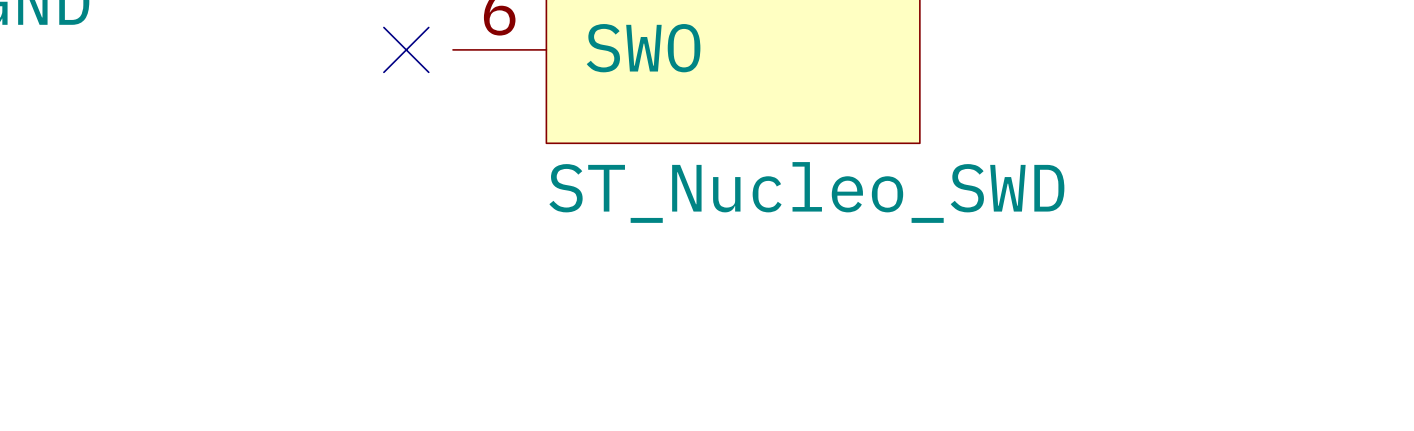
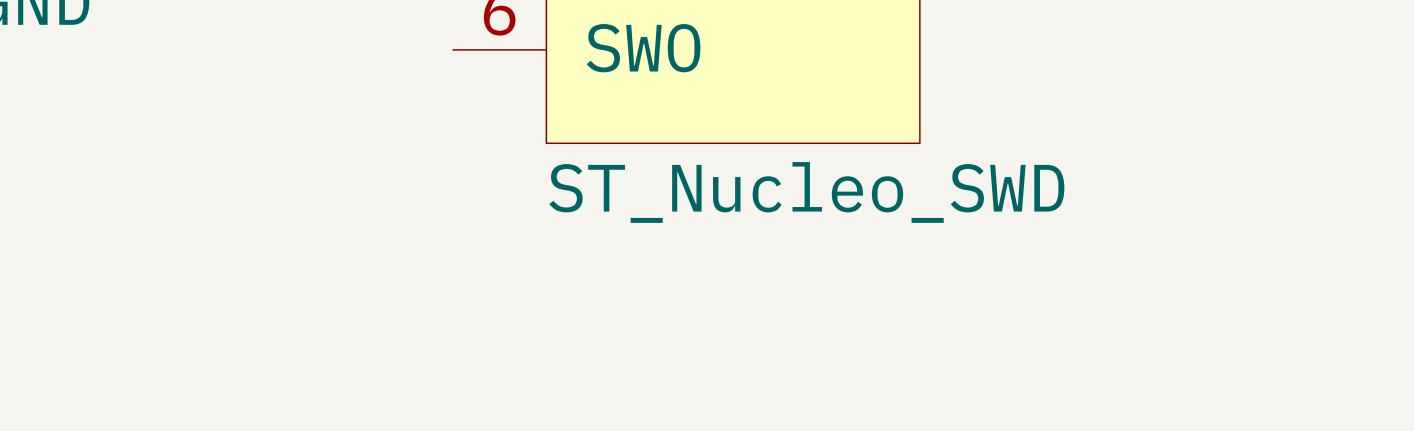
no-connect mark: (406, 49) -> none

